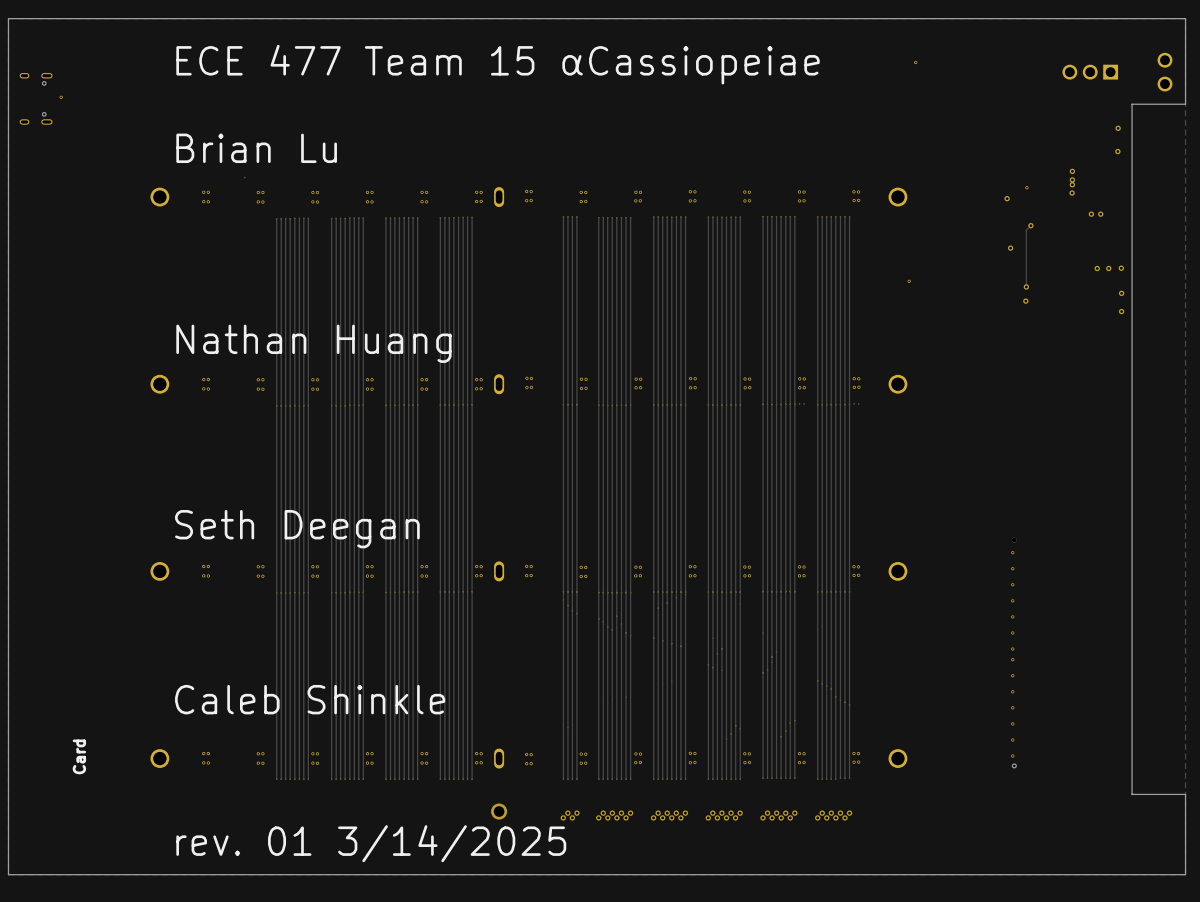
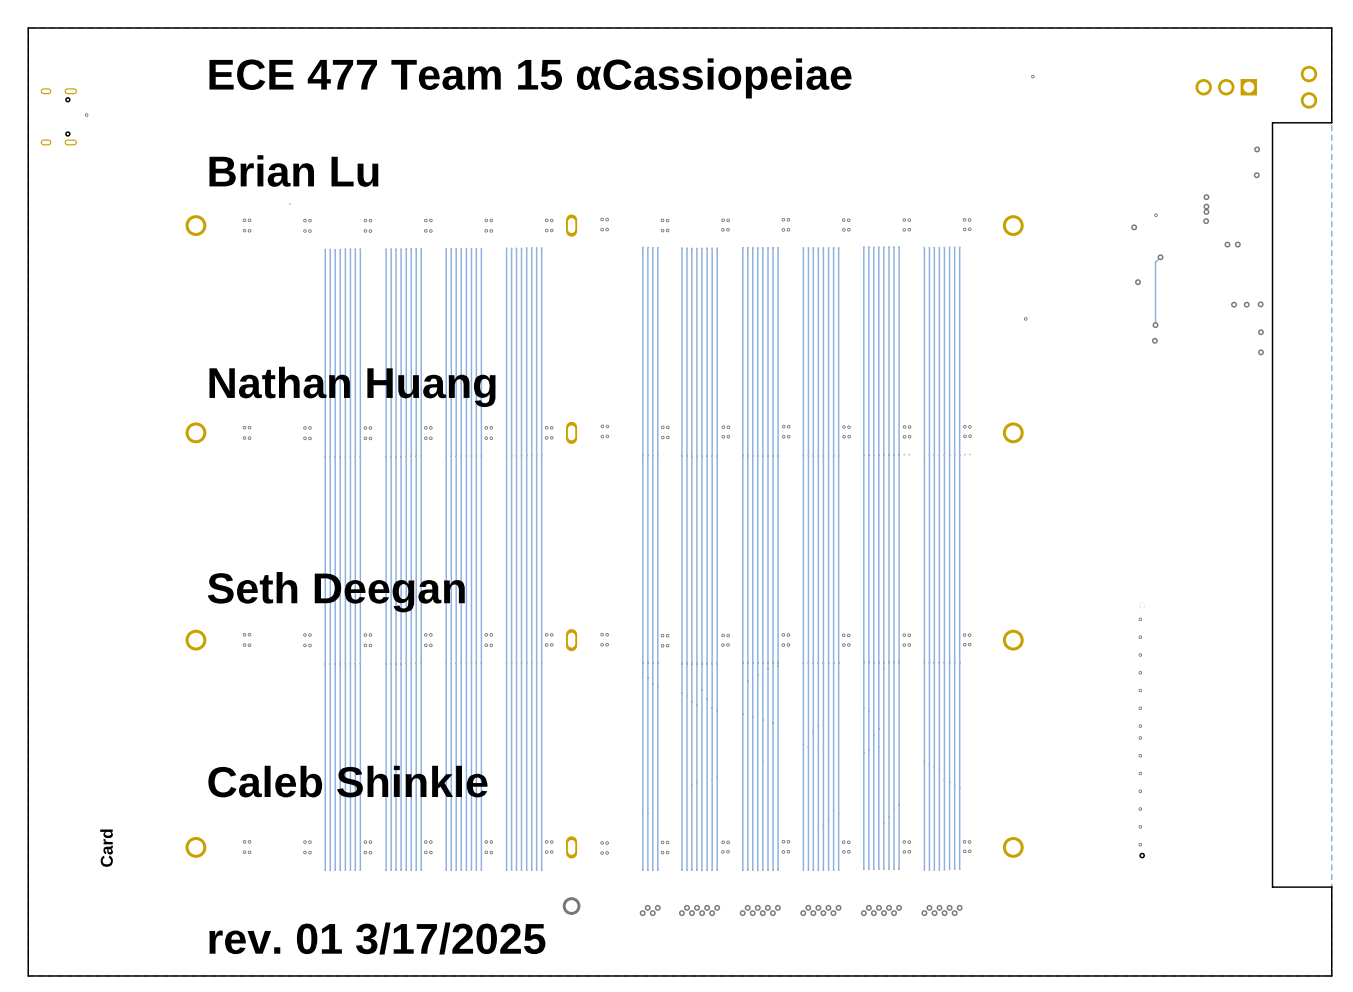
text: rev. 01 3/14/2025 (371, 843) -> rev. 01 3/17/2025 (377, 938)

